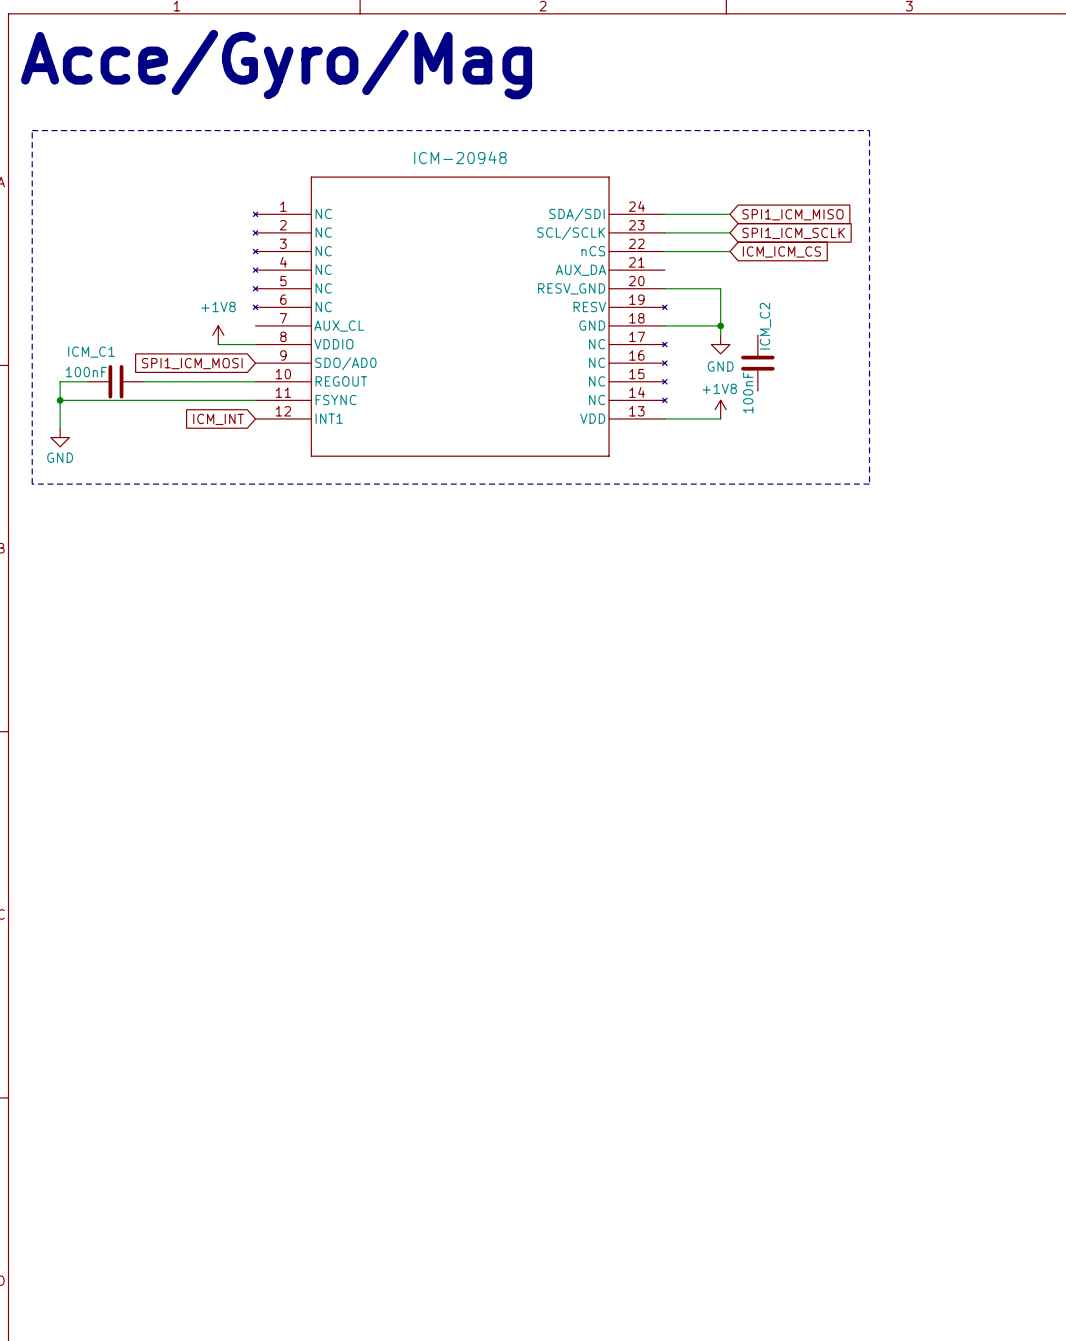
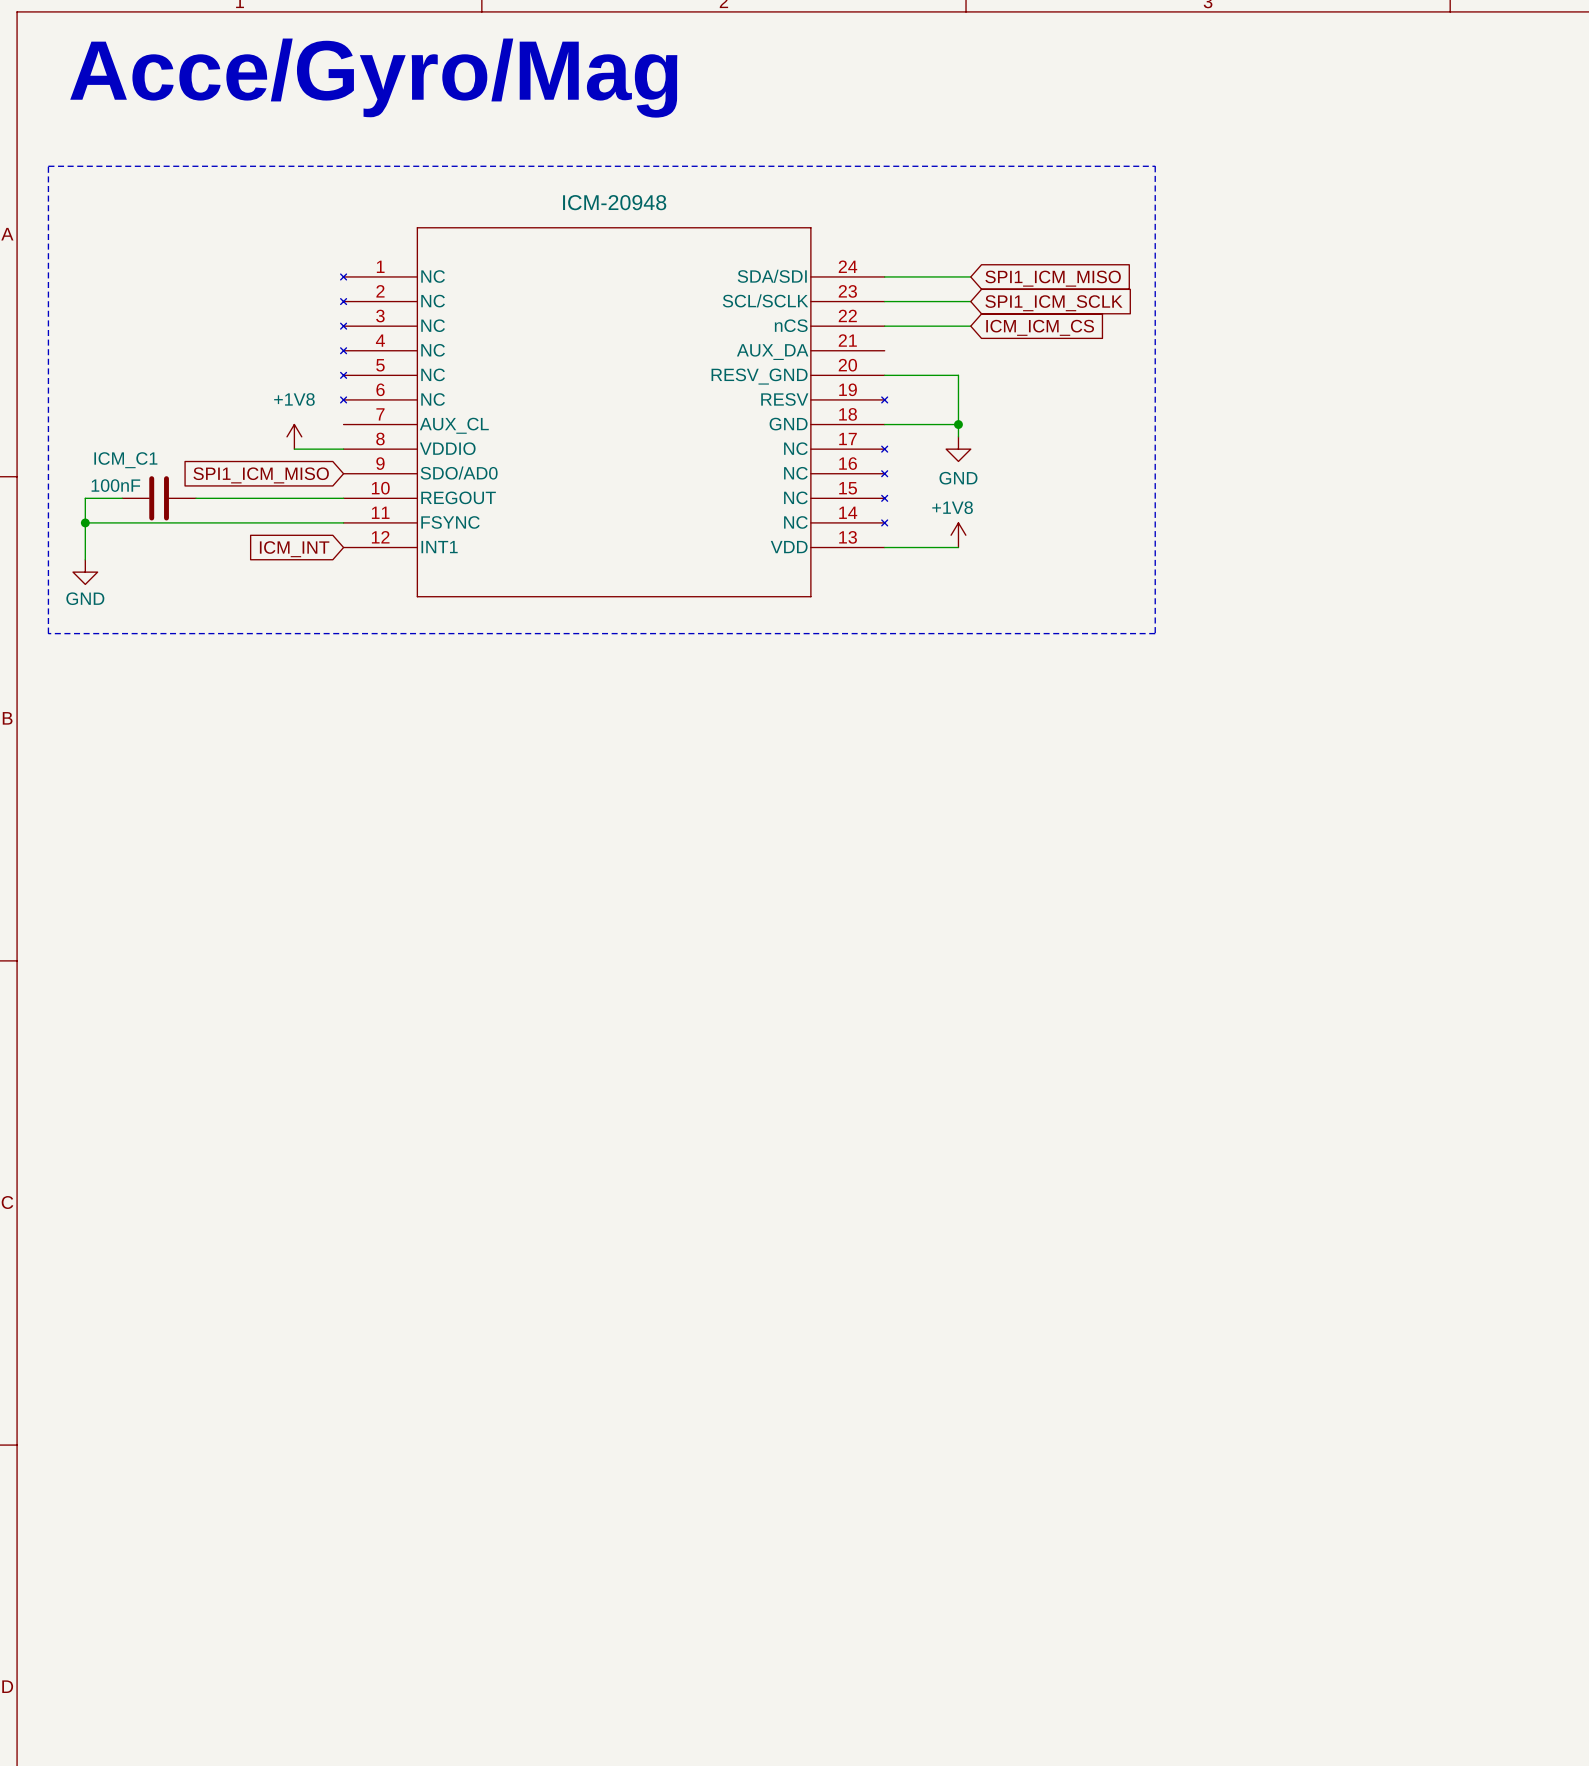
global label: SPI1_ICM_MOSI (192, 363) -> SPI1_ICM_MISO (261, 475)
ICM_C2: 100nF (757, 363) -> none

